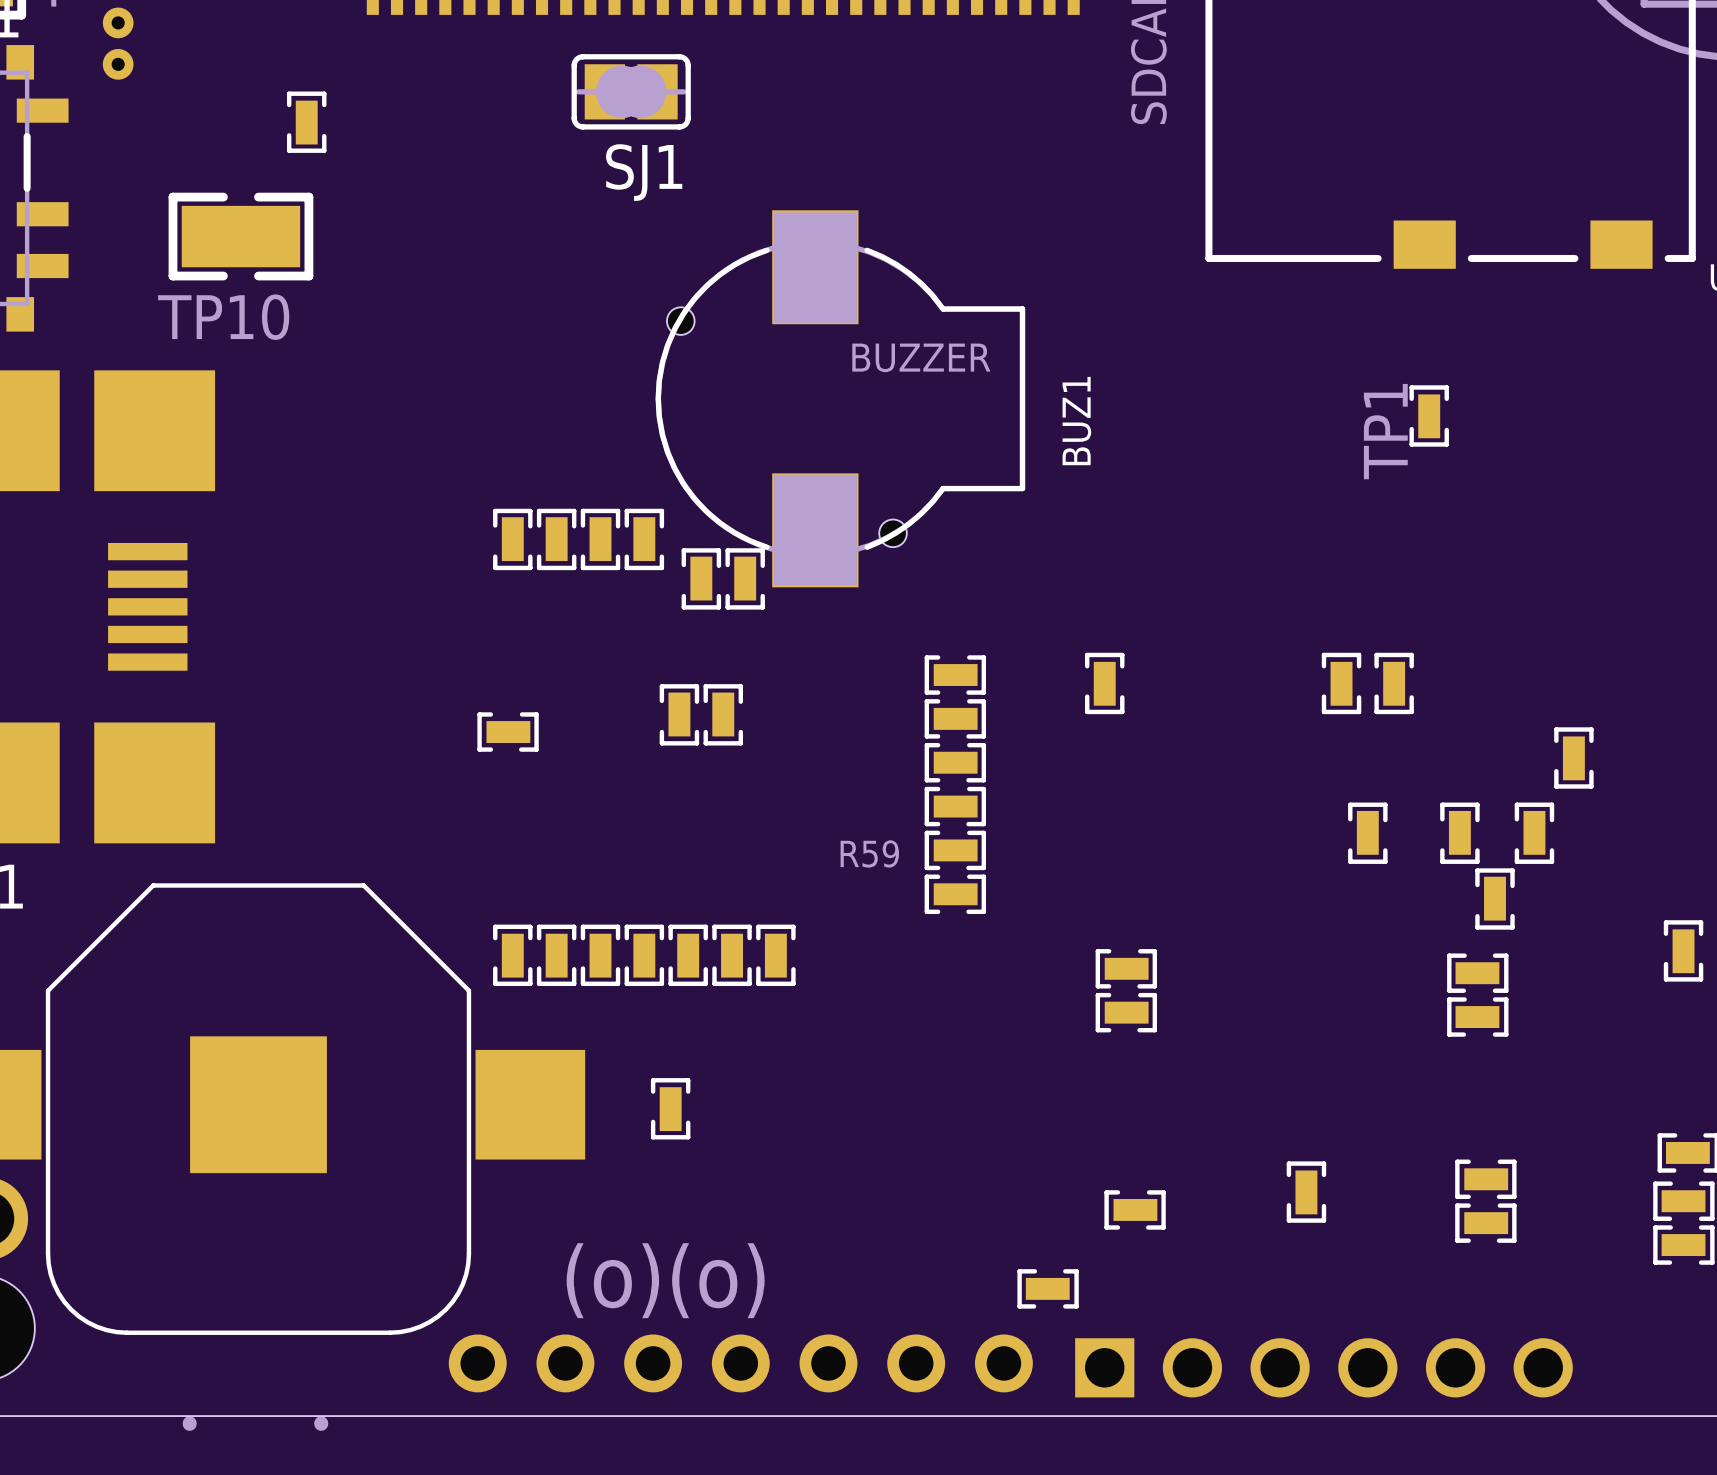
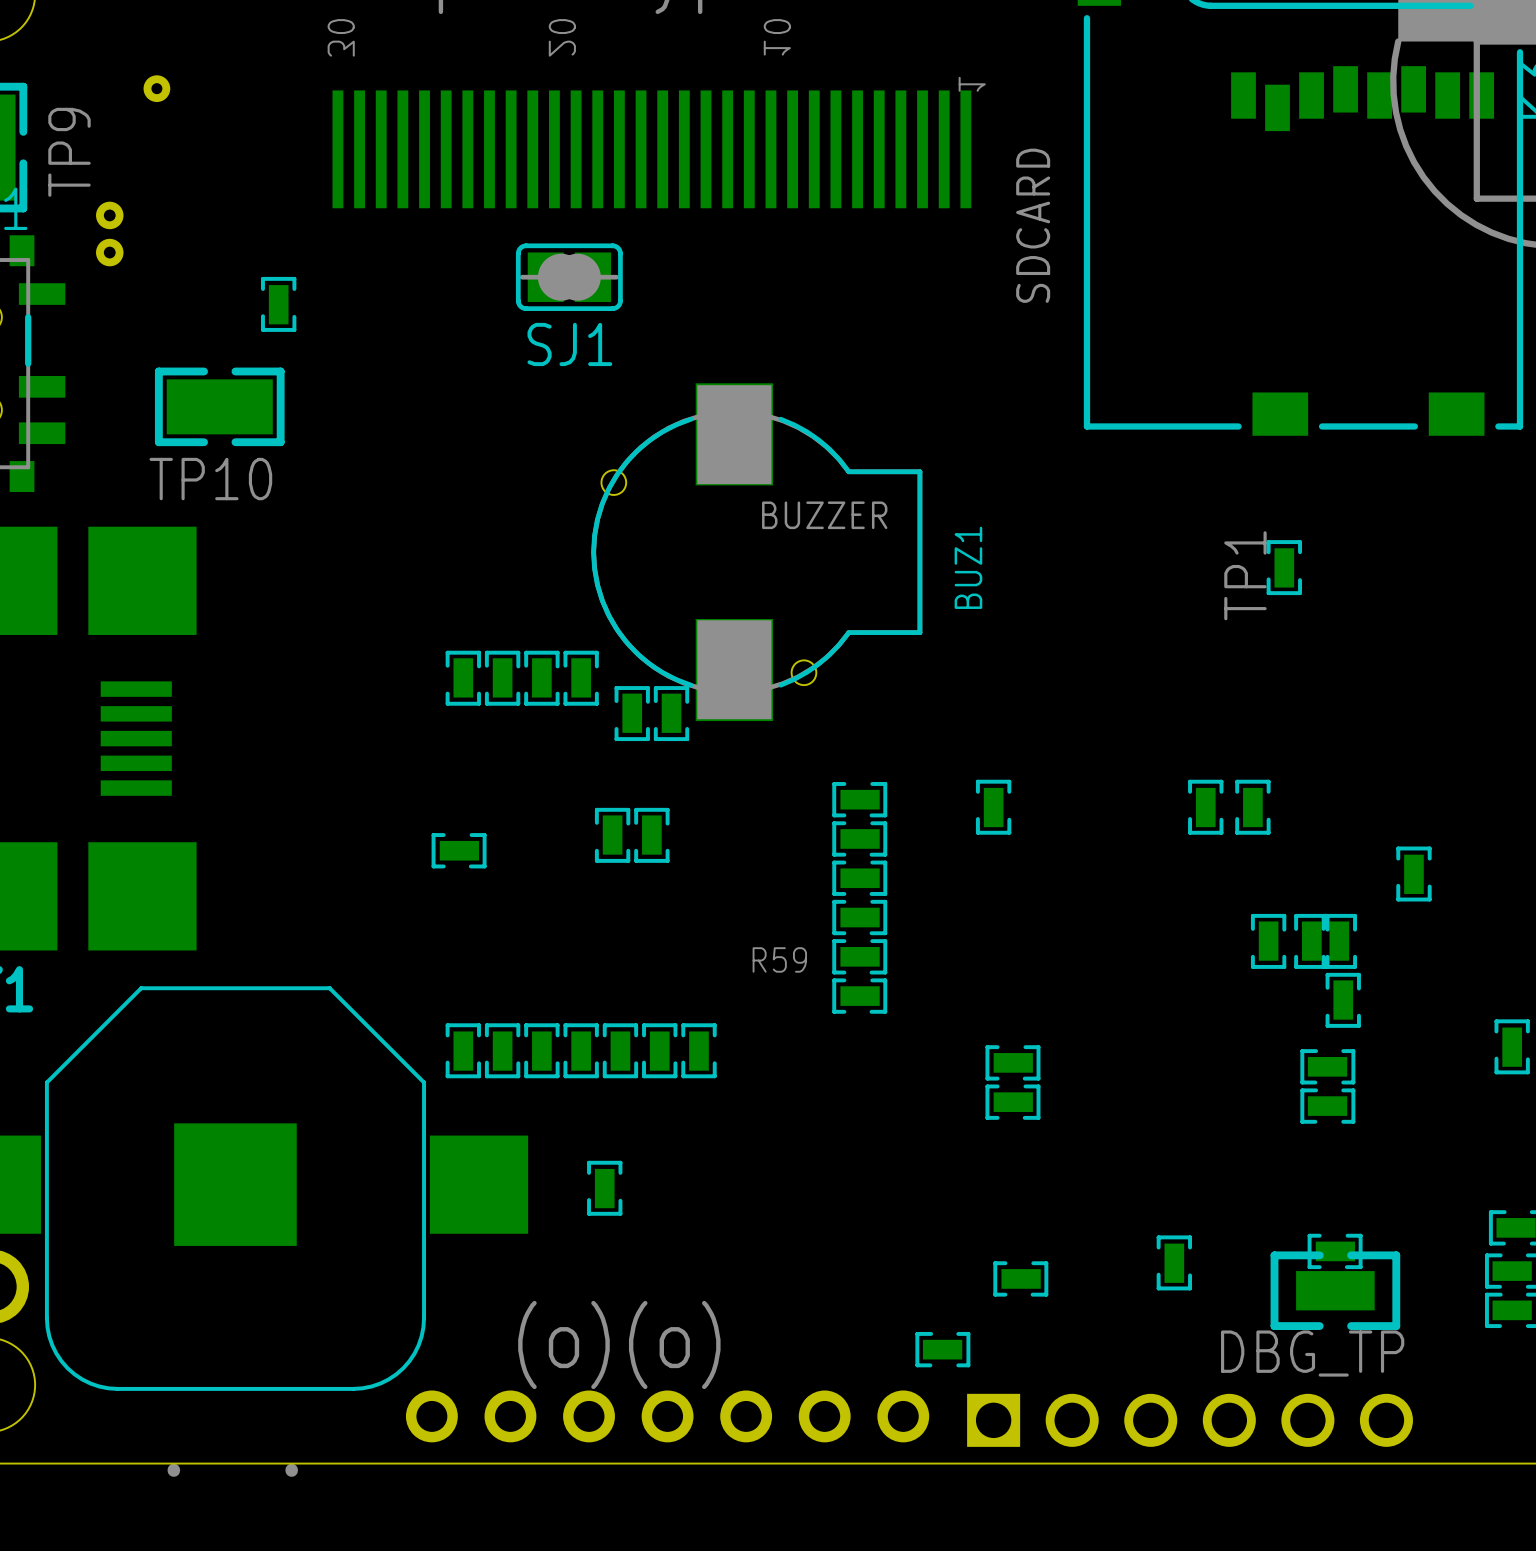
part position: (1367, 833) -> (1268, 941)
part position: (1534, 833) -> (1339, 941)
part: (1485, 1223) -> none
DBG_TP: none -> (1335, 1290)

